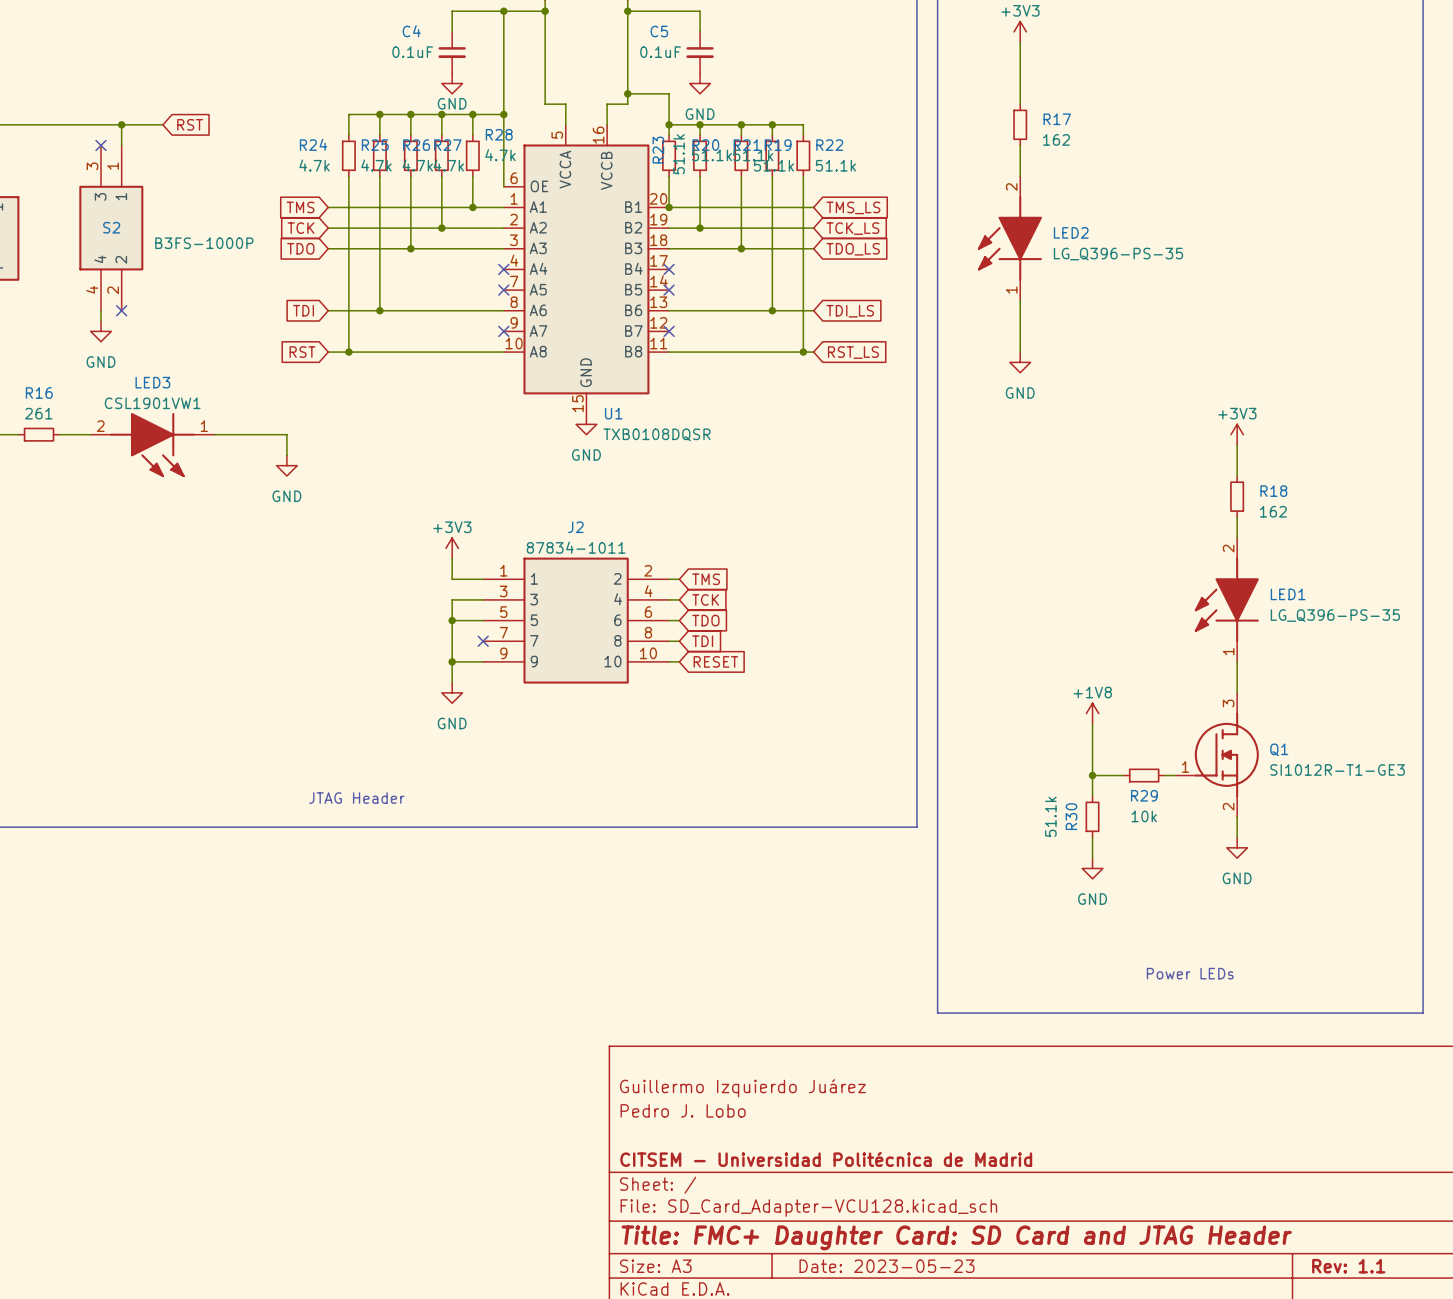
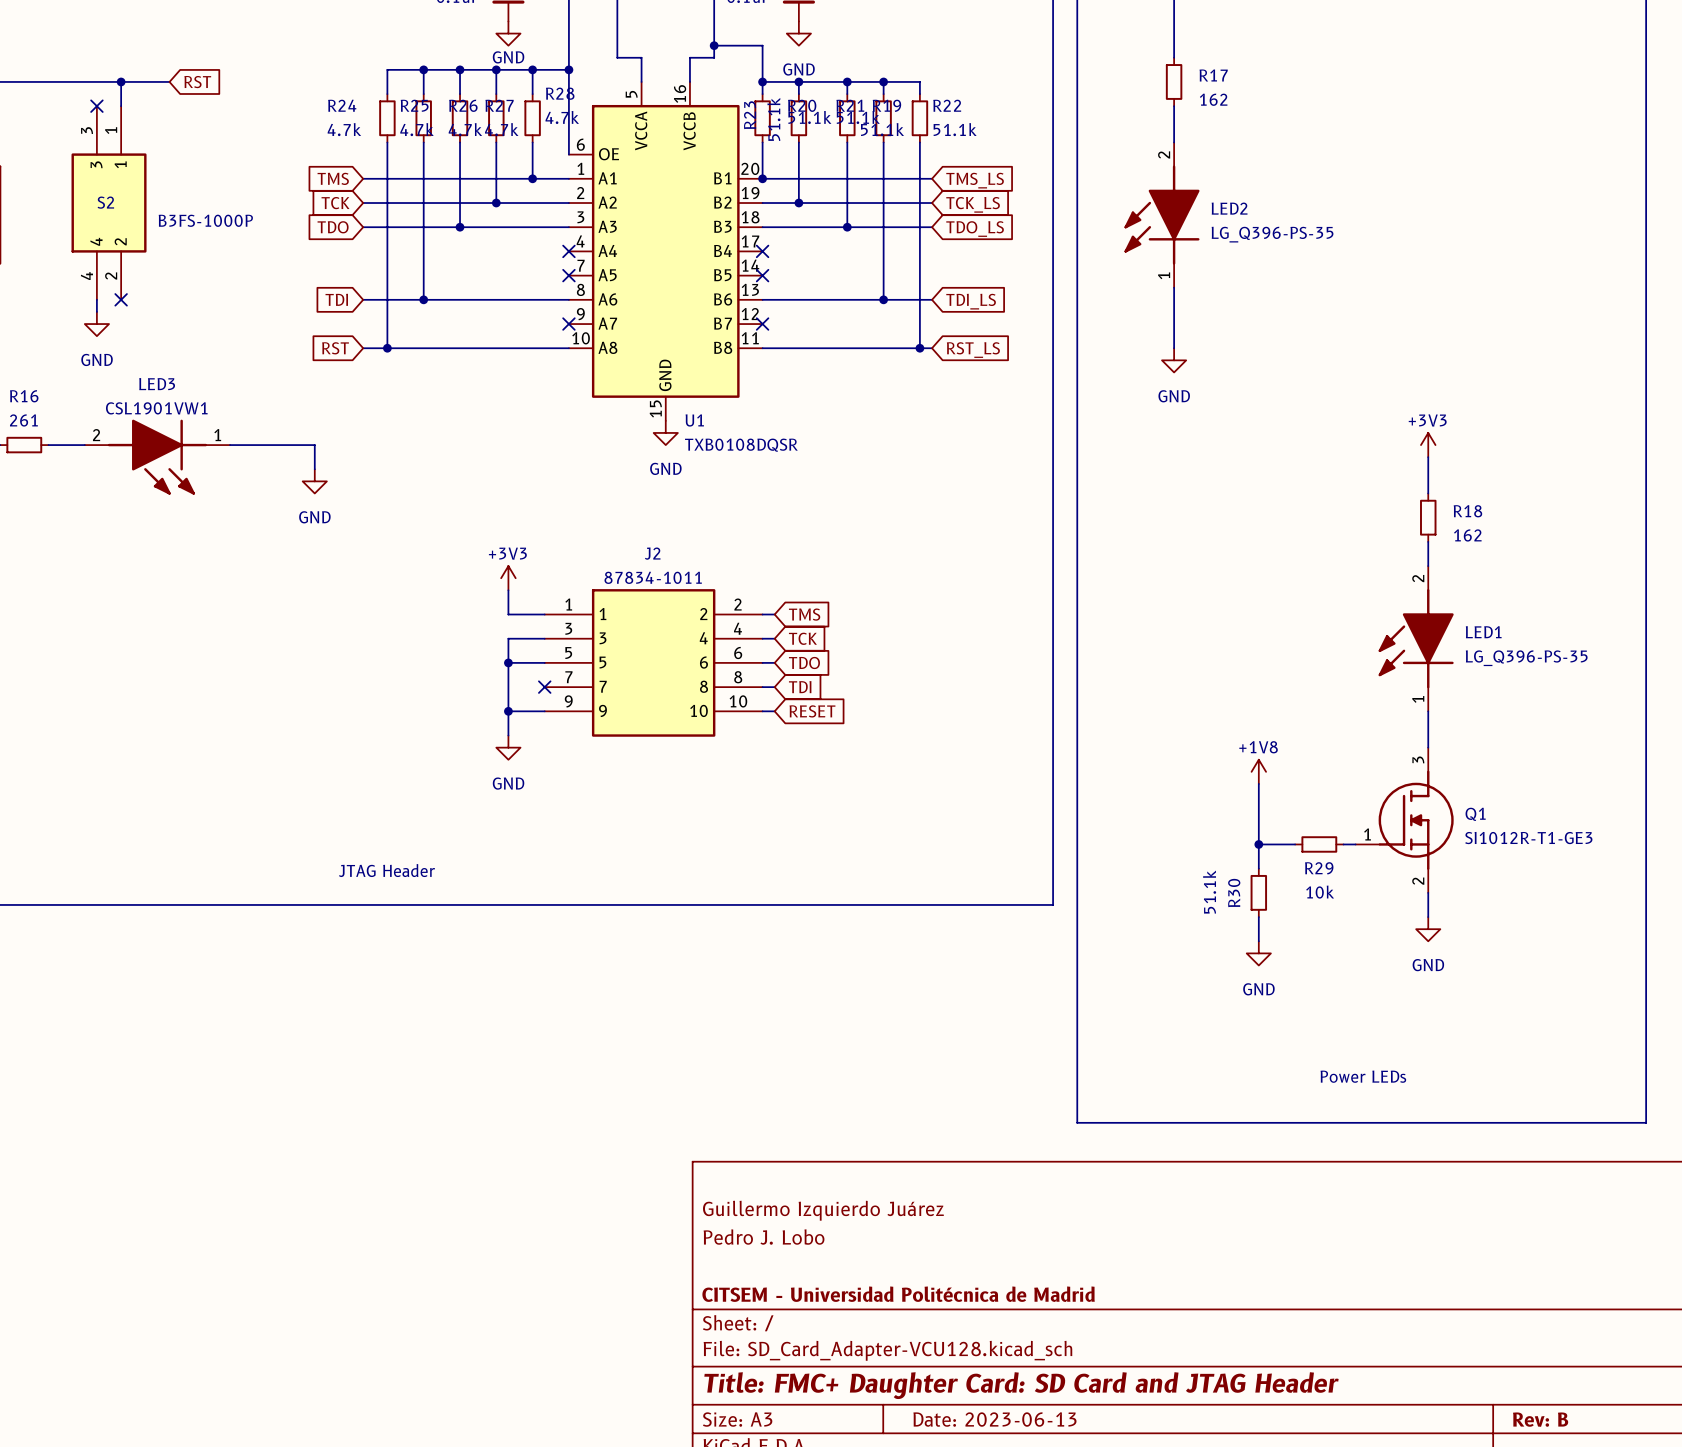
title block: Date: 2023-05-23 (887, 1266) -> Date: 2023-06-13 (994, 1419)
title block: Rev: 1.1 (1348, 1266) -> Rev: B (1540, 1419)

